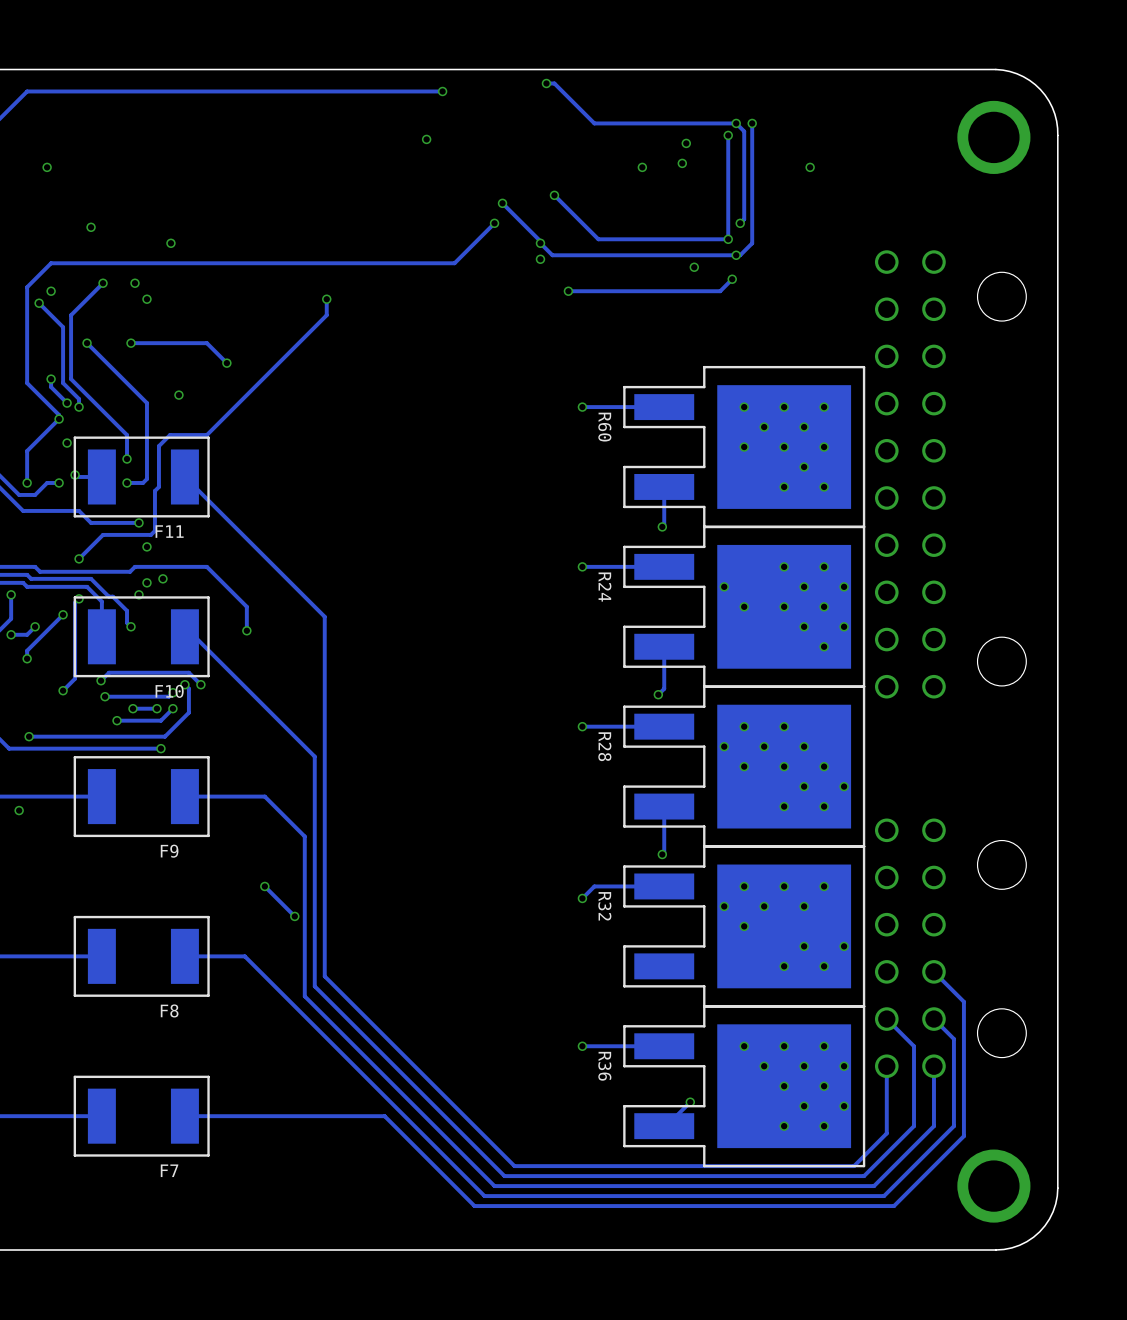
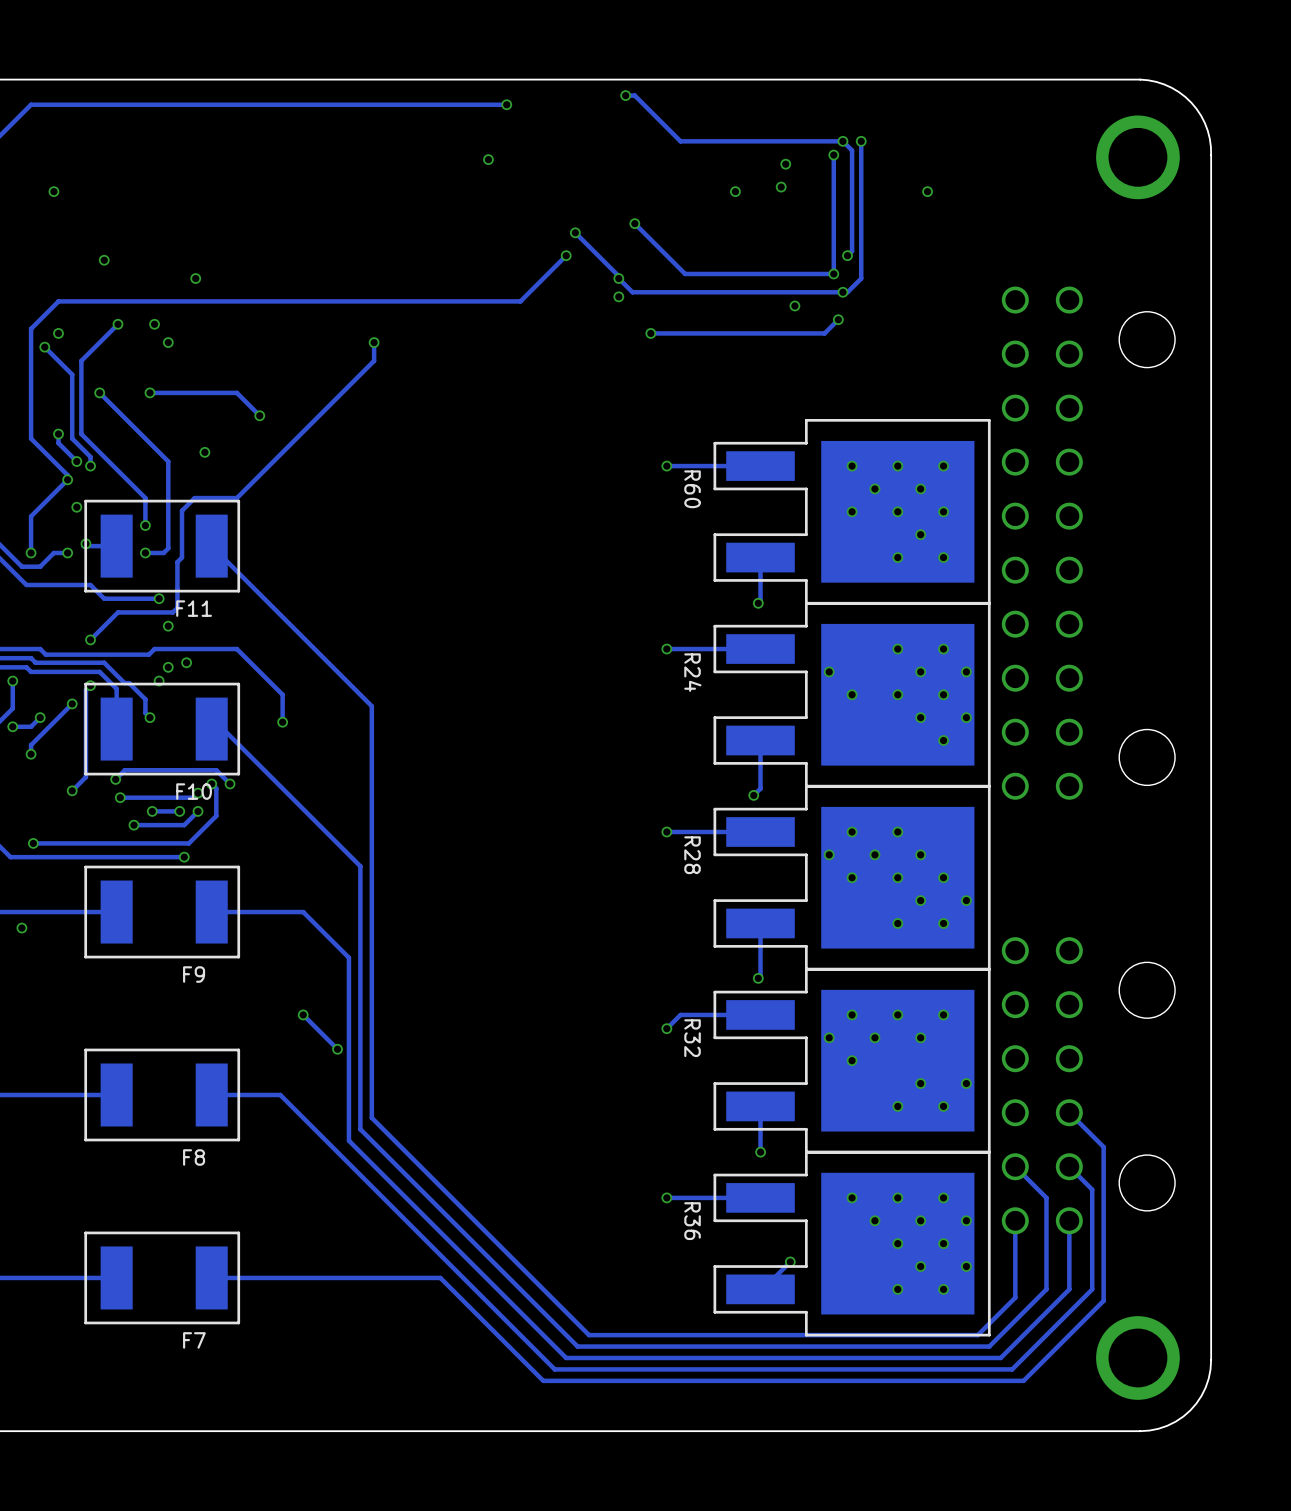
track: none -> (760, 1106) (760, 1152)
via: none -> (760, 1152)

